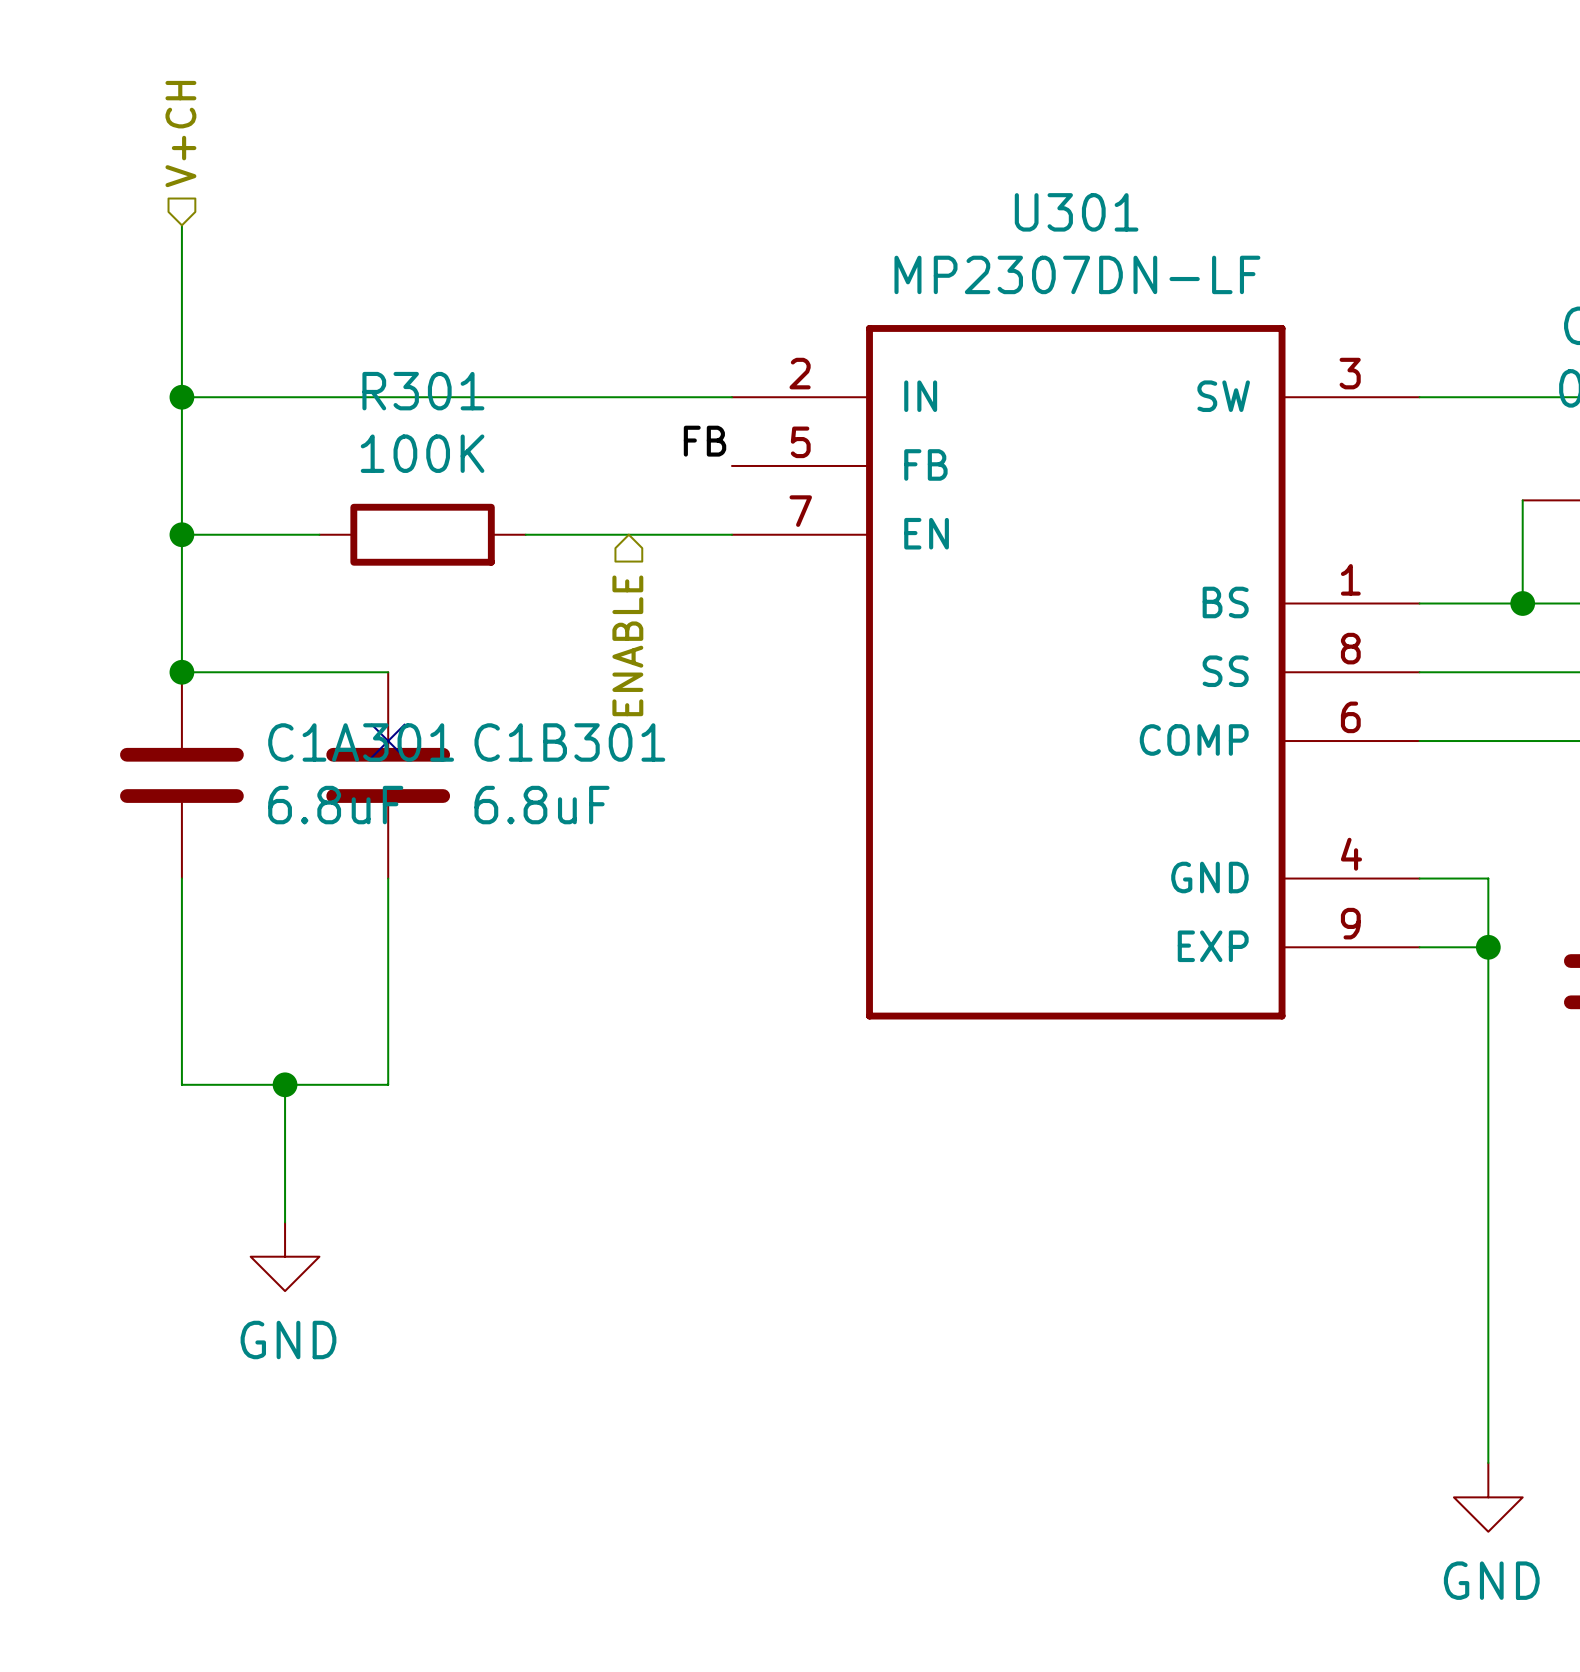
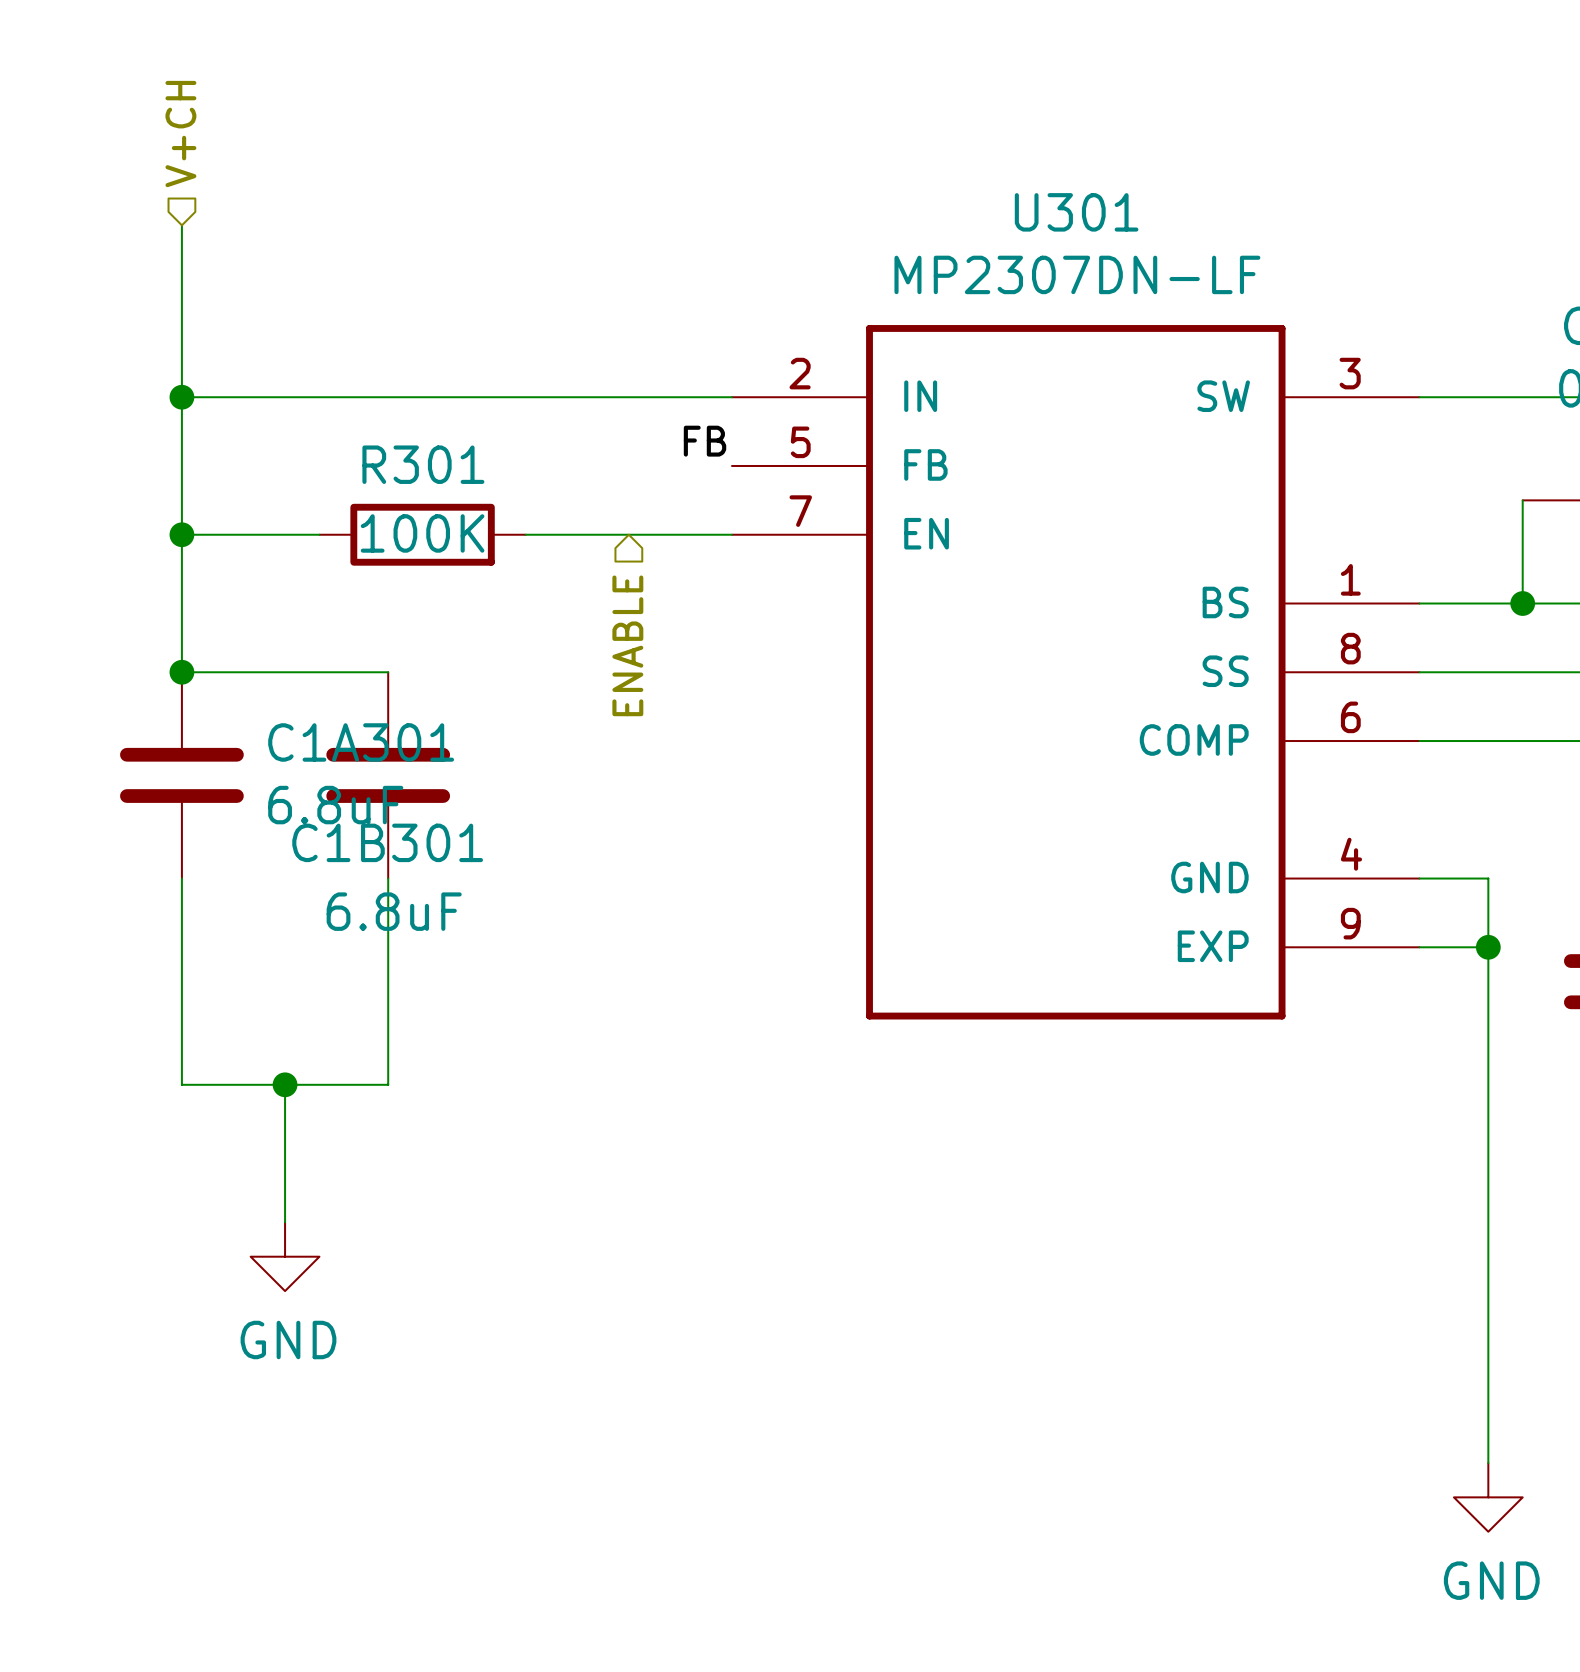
R301 name position: R301 (423, 391) -> R301 (423, 464)
R301 value position: 100K (422, 453) -> 100K (422, 533)
no-connect mark: (388, 741) -> none
C1B301 name position: C1B301 (569, 742) -> C1B301 (387, 842)
C1B301 value position: 6.8uF (542, 805) -> 6.8uF (394, 911)

